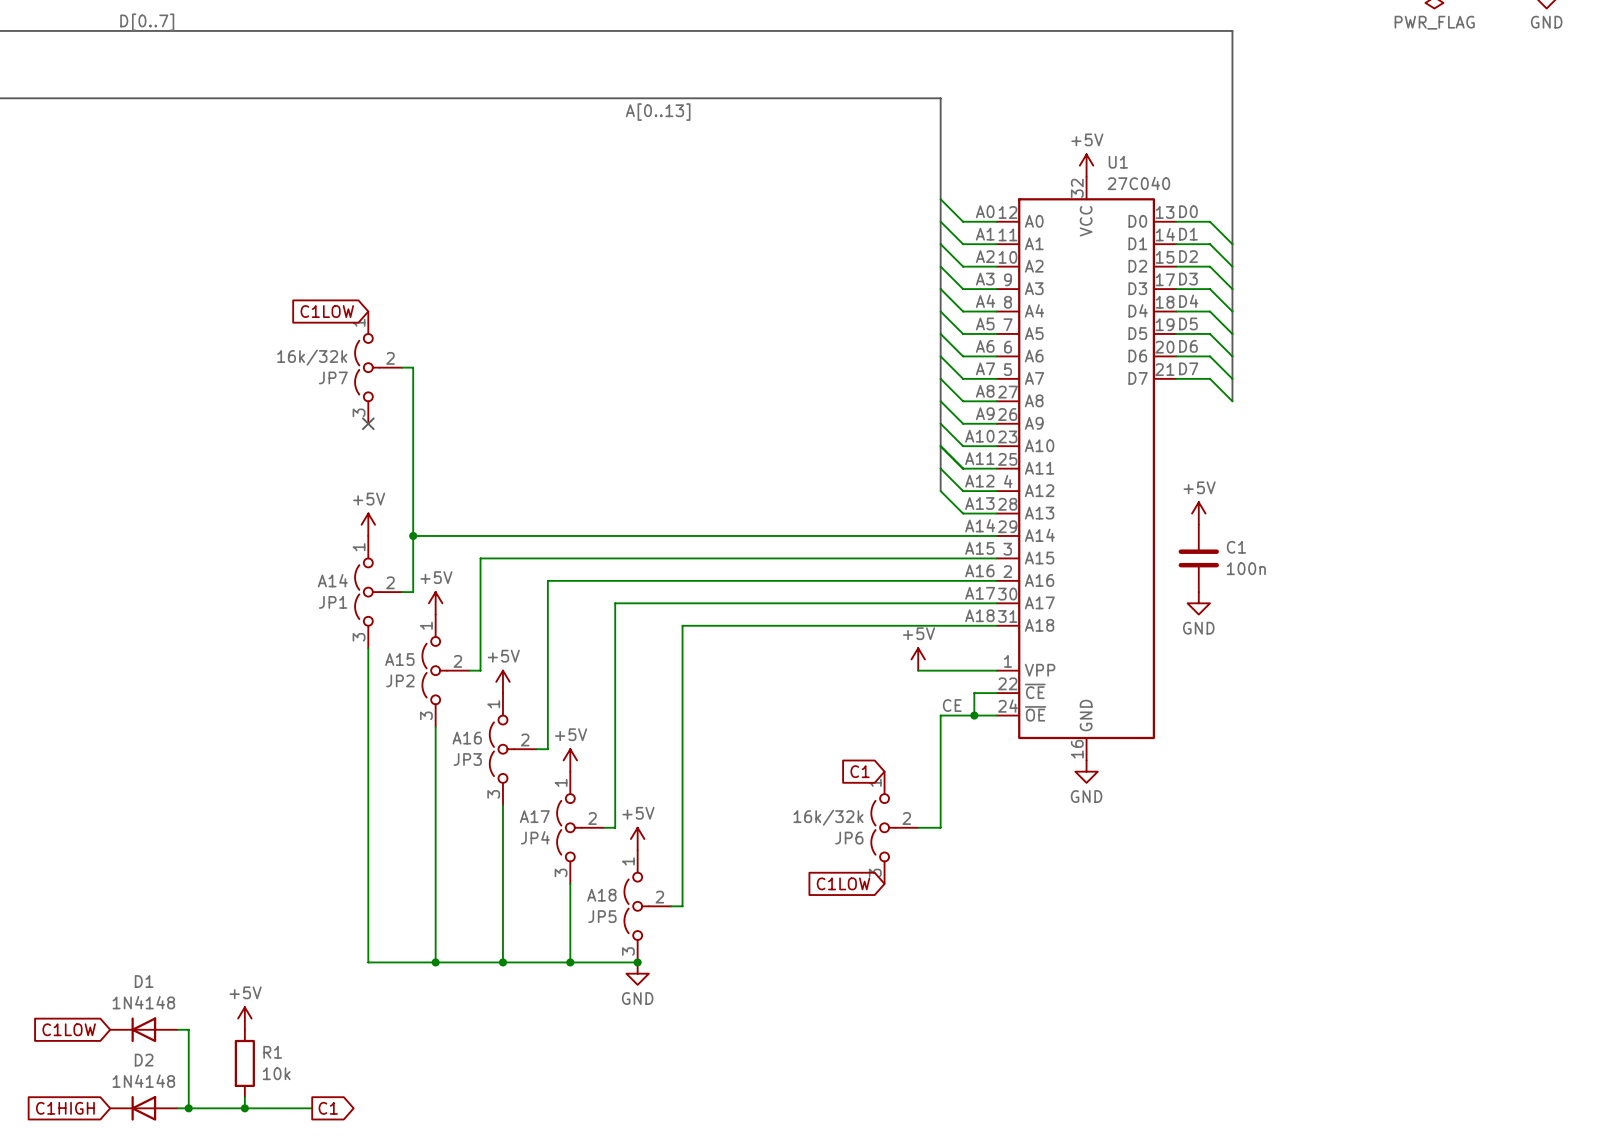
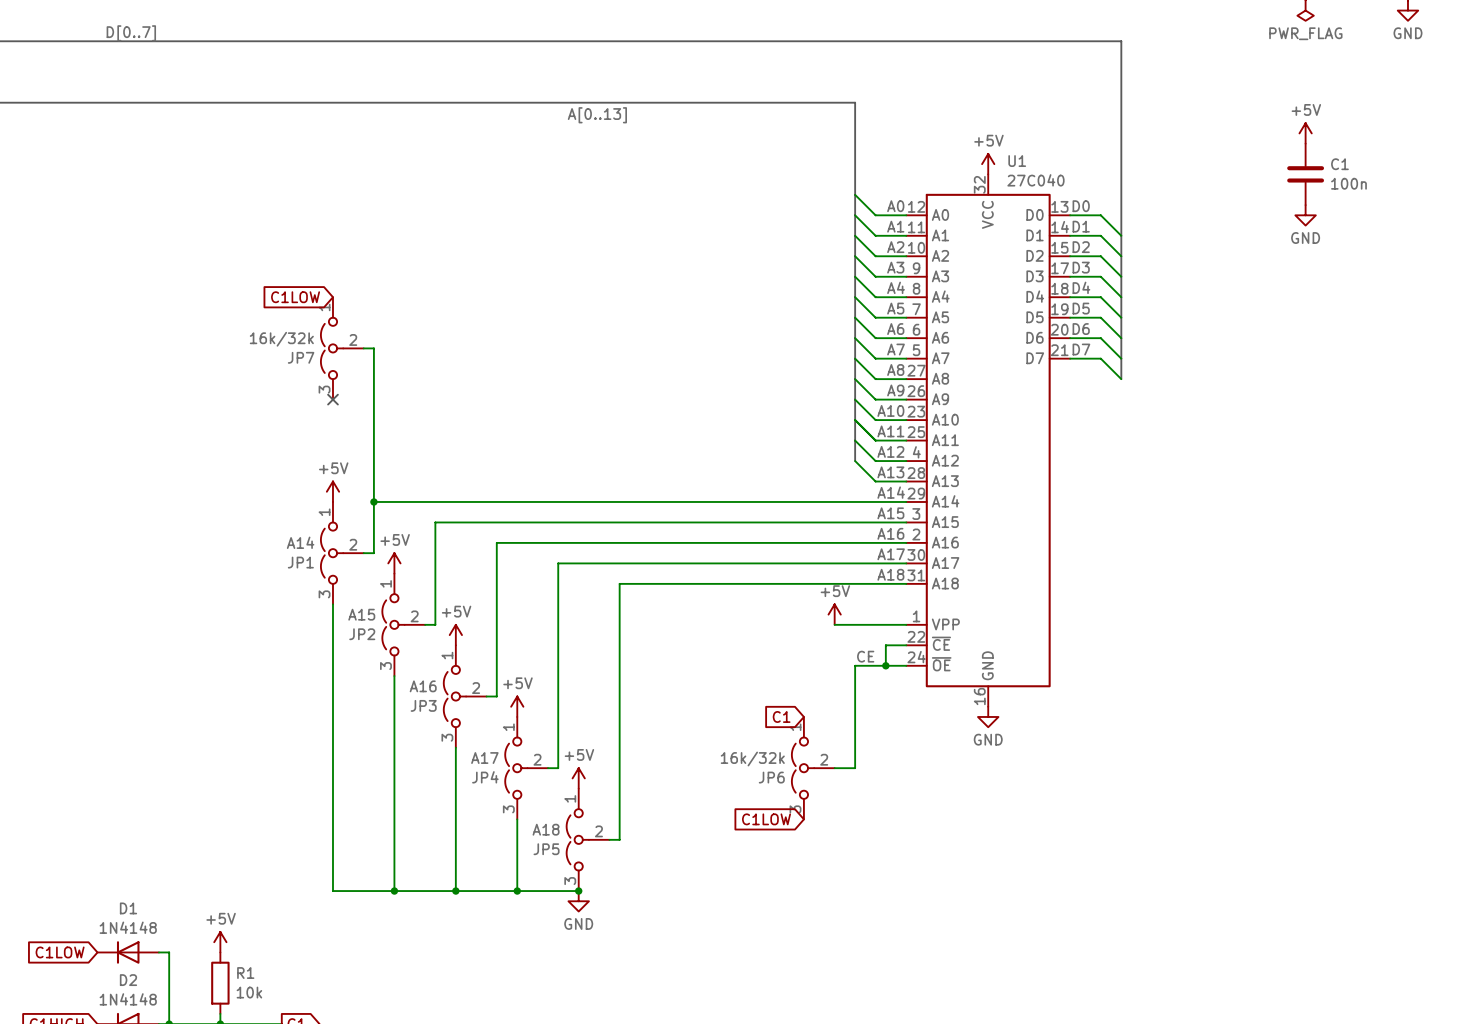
power symbol: none -> +5V (1305, 133)
power symbol: none -> GND (1305, 215)
power symbol: +5V (1198, 513) -> none
C1 position: (1198, 558) -> (1305, 174)
power symbol: GND (1198, 603) -> none

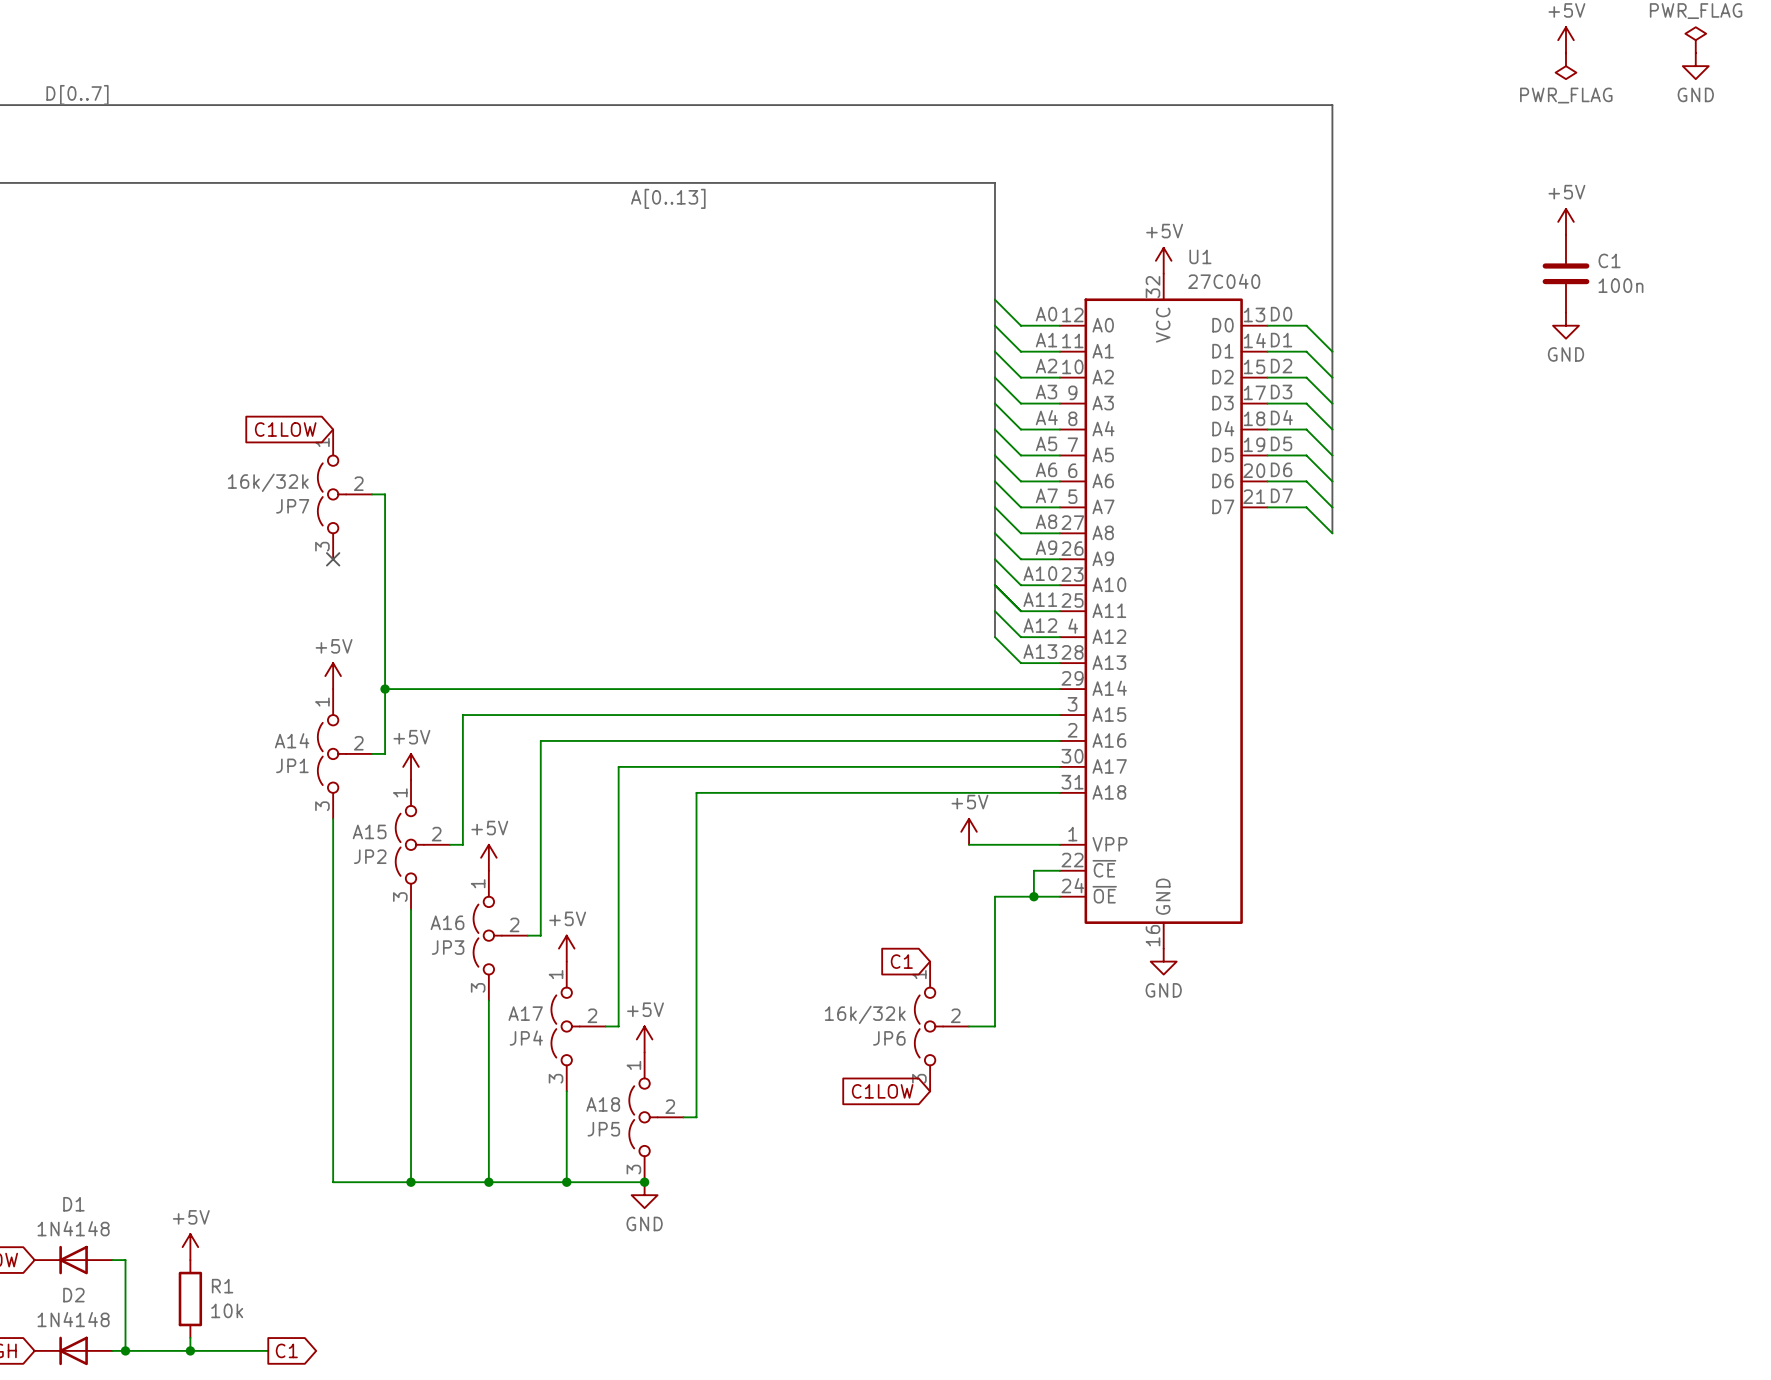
label: A14 (891, 492) -> none
label: A15 (890, 513) -> none
label: A16 (890, 533) -> none
label: A17 (891, 554) -> none
label: A18 (890, 574) -> none
label: CE (865, 656) -> none

